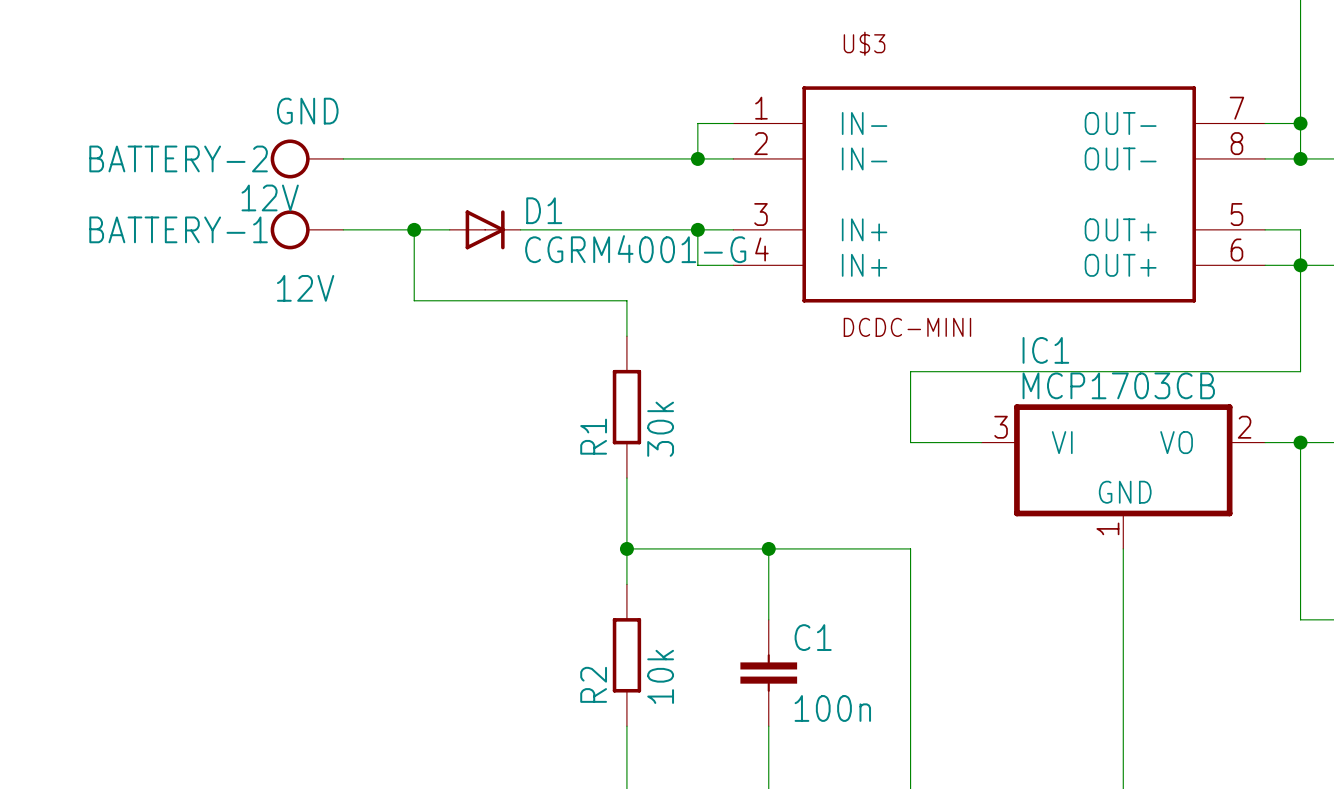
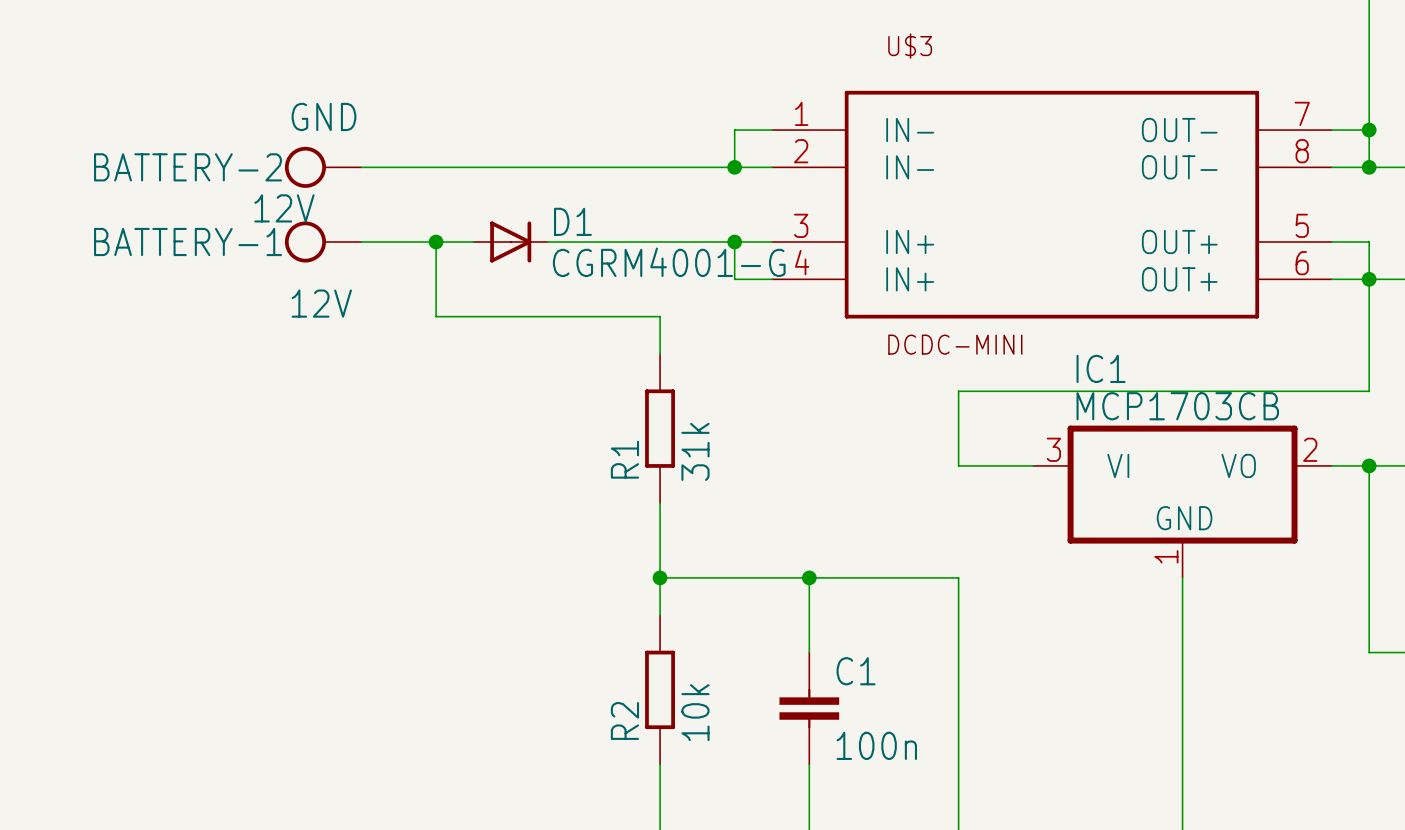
R1 value: 30k (660, 429) -> 31k (695, 451)

